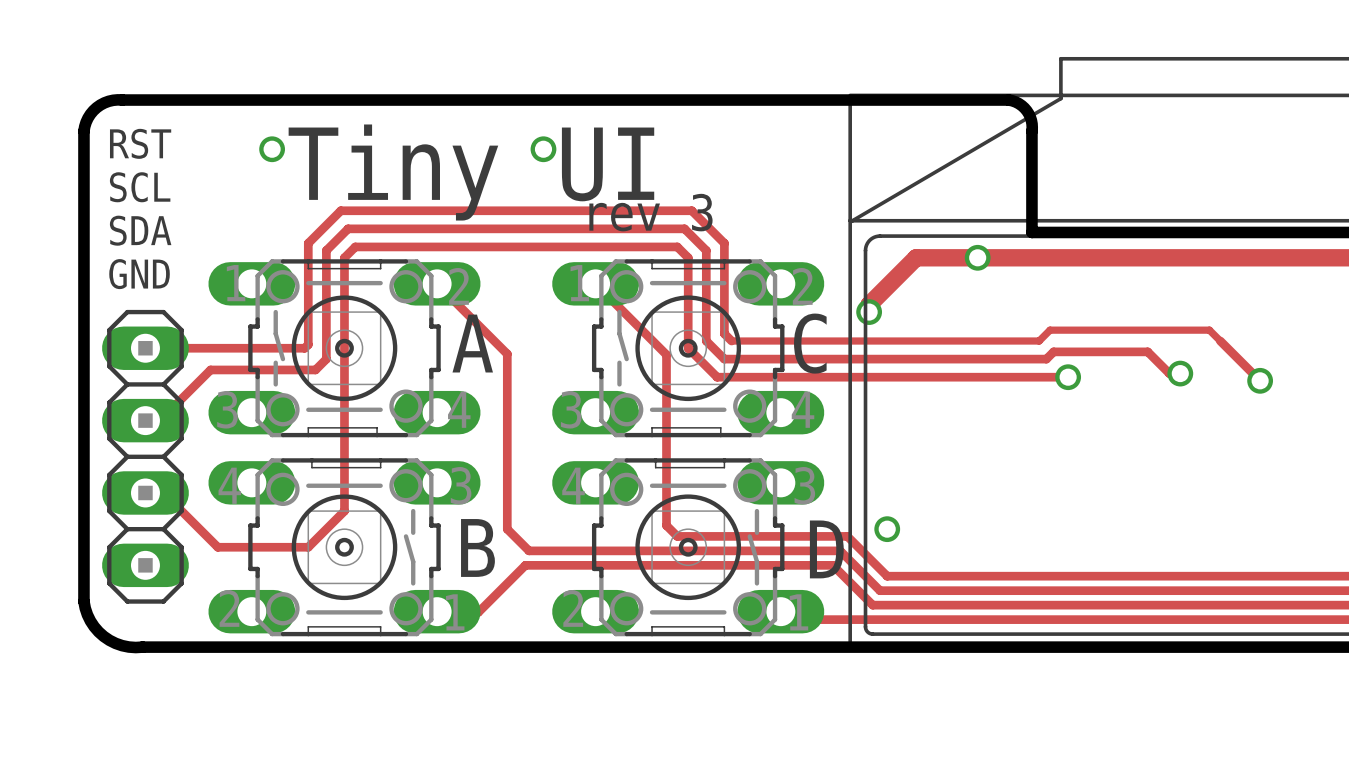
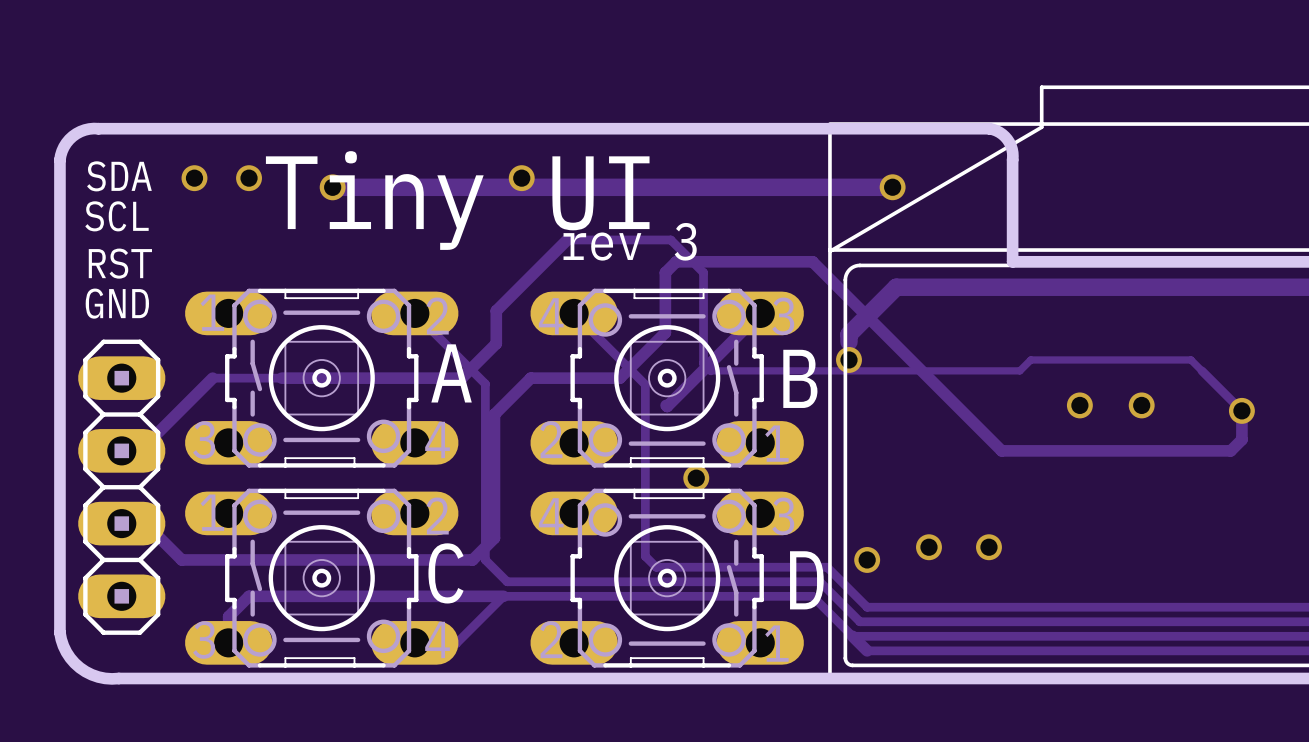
text position: RST (140, 143) -> RST (120, 263)
via: none -> (194, 178)
track: none -> (332, 187) (892, 187)
via: none -> (332, 187)
via: none -> (892, 187)
track: (588, 210) (340, 210) (308, 243) (308, 344) (304, 348) -> (567, 239) (496, 310) (496, 343) (461, 378) (281, 378)
text position: SDA (140, 230) -> SDA (119, 176)
via: (977, 257) -> none
track: none -> (760, 313) (667, 406) (666, 405)
via position: (869, 312) -> (848, 359)
track: (145, 348) (235, 348) -> (136, 450) (139, 450) (212, 378)
C position: (688, 348) -> (321, 578)
track: (1180, 373) (1169, 373) (1147, 351) (1053, 351) (1046, 359) (724, 359) (706, 341) (706, 250) (684, 228) (348, 228) (326, 250) (326, 359) (315, 369) (210, 369) (159, 420) -> none
via position: (1180, 373) -> (1141, 405)
track: (1068, 377) (717, 377) (688, 348) (688, 257) (677, 246) (355, 246) (344, 257) (344, 511) (308, 547) (217, 547) (163, 492) -> (1241, 418) (1241, 439) (1230, 450) (1001, 450) (812, 261) (676, 261) (665, 272) (665, 332) (619, 378) (530, 378) (494, 414) (494, 538) (472, 559) (181, 559) (145, 523) (139, 523)
via position: (1068, 377) -> (1079, 405)
via: none -> (696, 478)
via: none -> (928, 547)
via: none -> (988, 547)
B position: (344, 547) -> (667, 378)
track: none -> (503, 596) (249, 596) (228, 616) (228, 642)
track: (780, 611) (788, 619) (887, 619) -> (852, 636) (867, 650)

